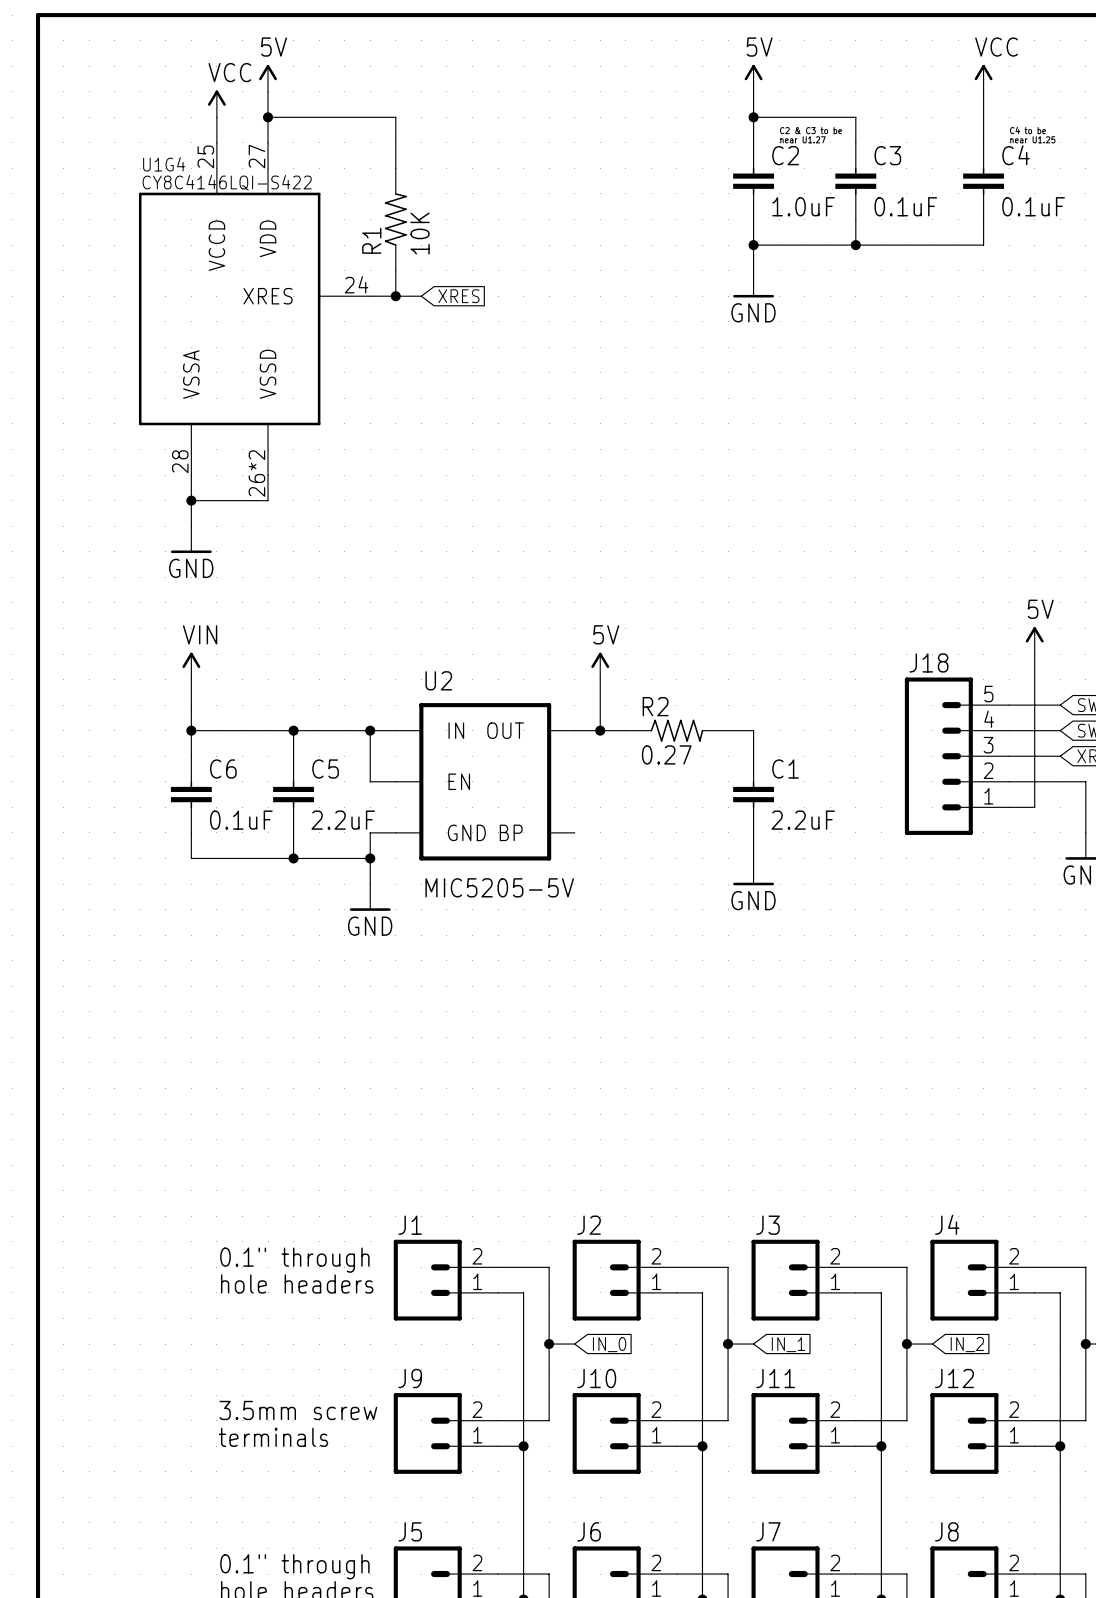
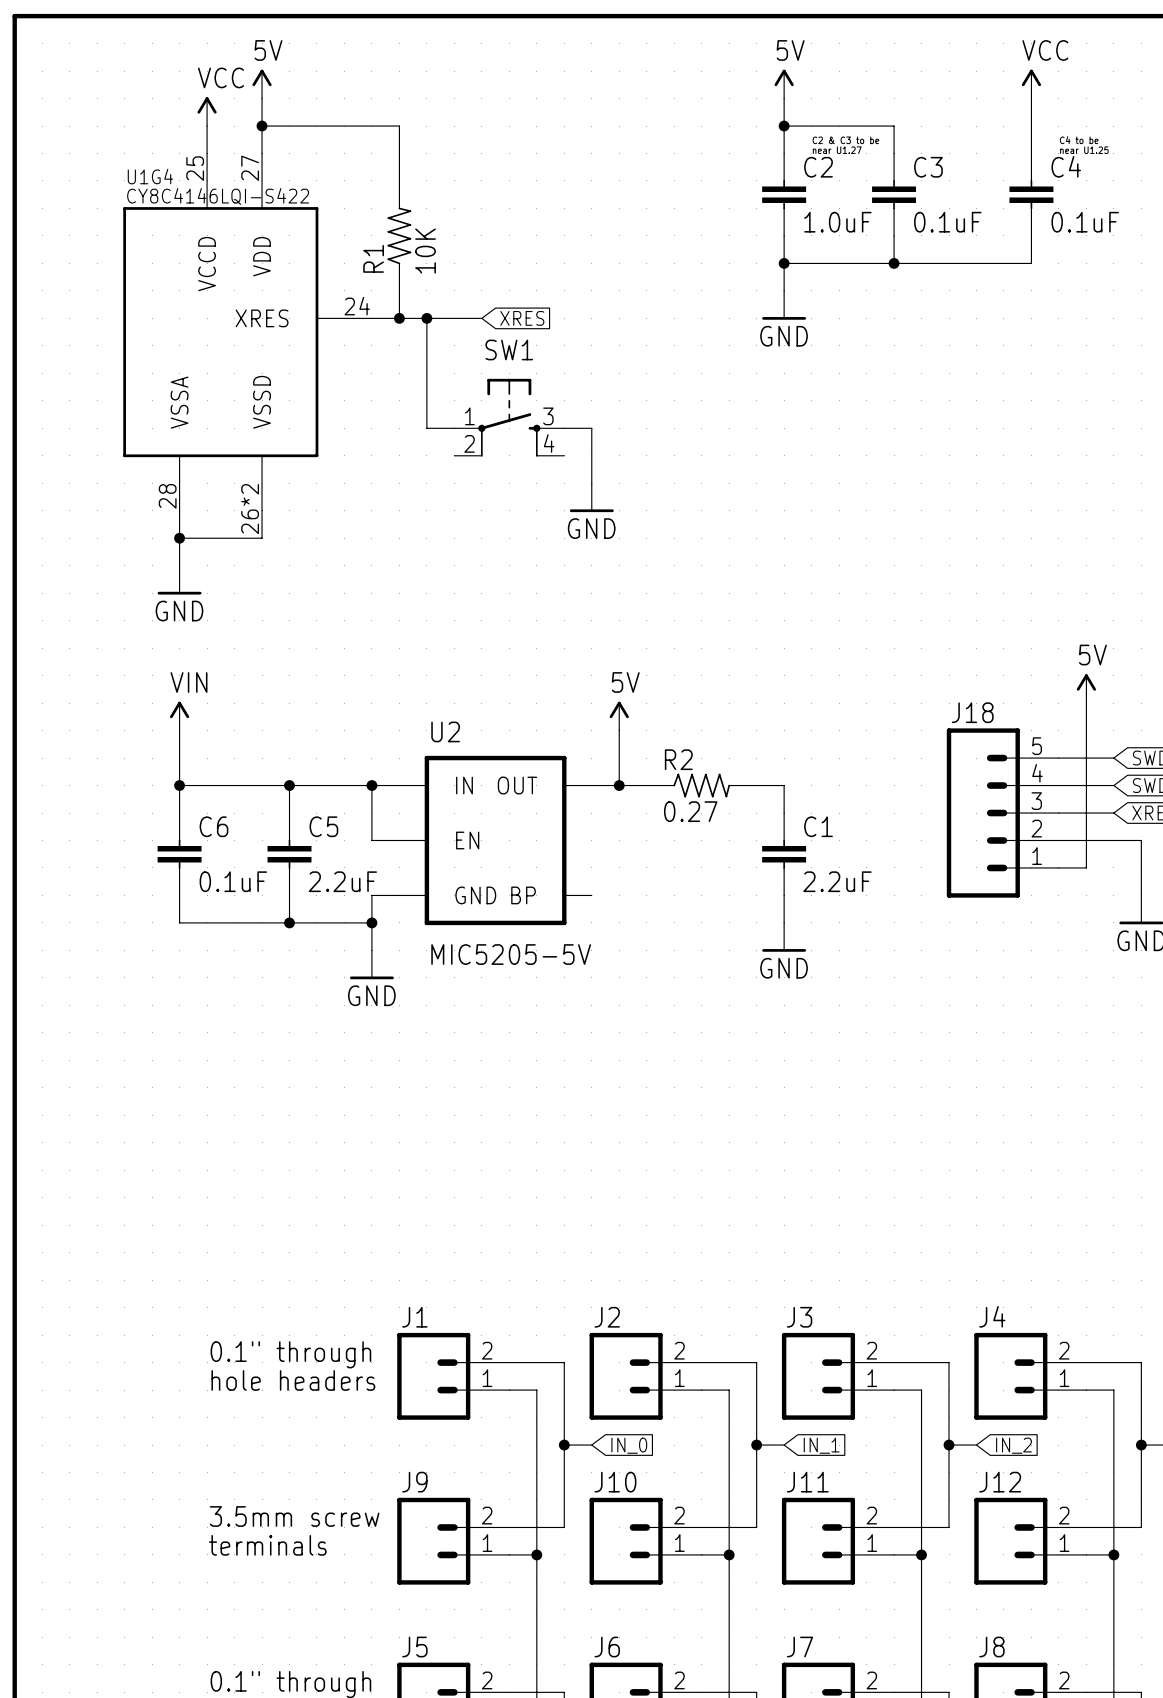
junction: none -> (426, 318)
global label position: XRES (458, 296) -> XRES (522, 318)
wire: none -> (481, 318) (426, 318) (426, 428) (454, 428)
SW1: none -> (509, 417)
wire: none -> (564, 428) (591, 428) (591, 483)
power symbol: none -> GND (591, 497)

